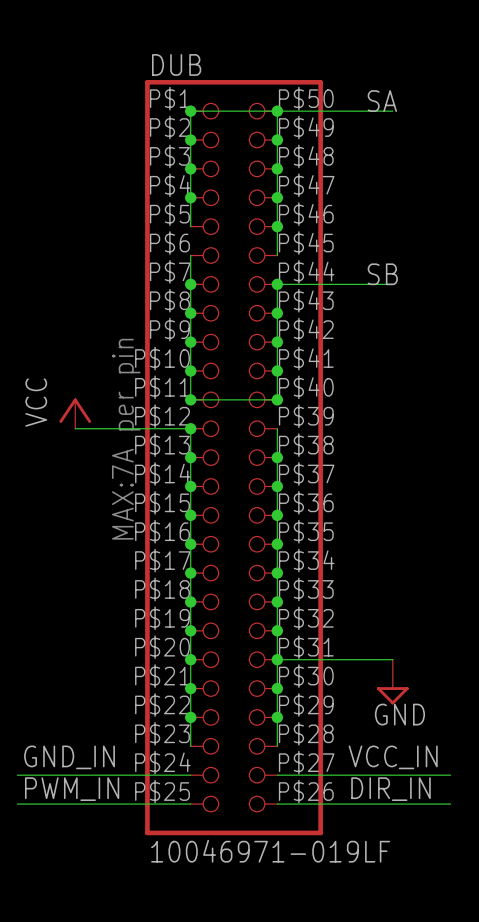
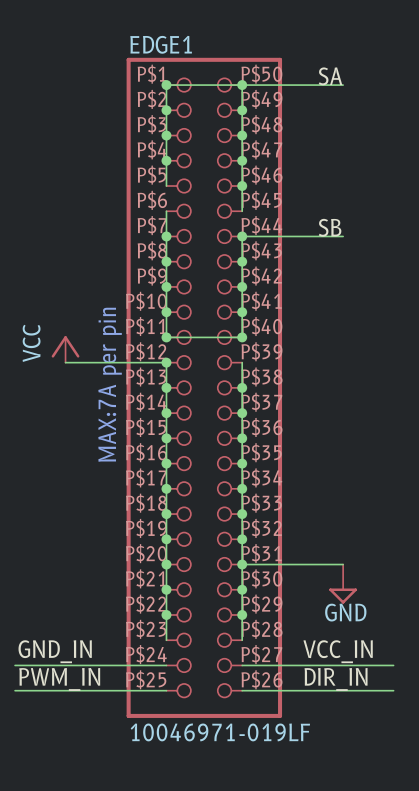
DUB name: DUB (176, 64) -> EDGE1 (161, 44)

